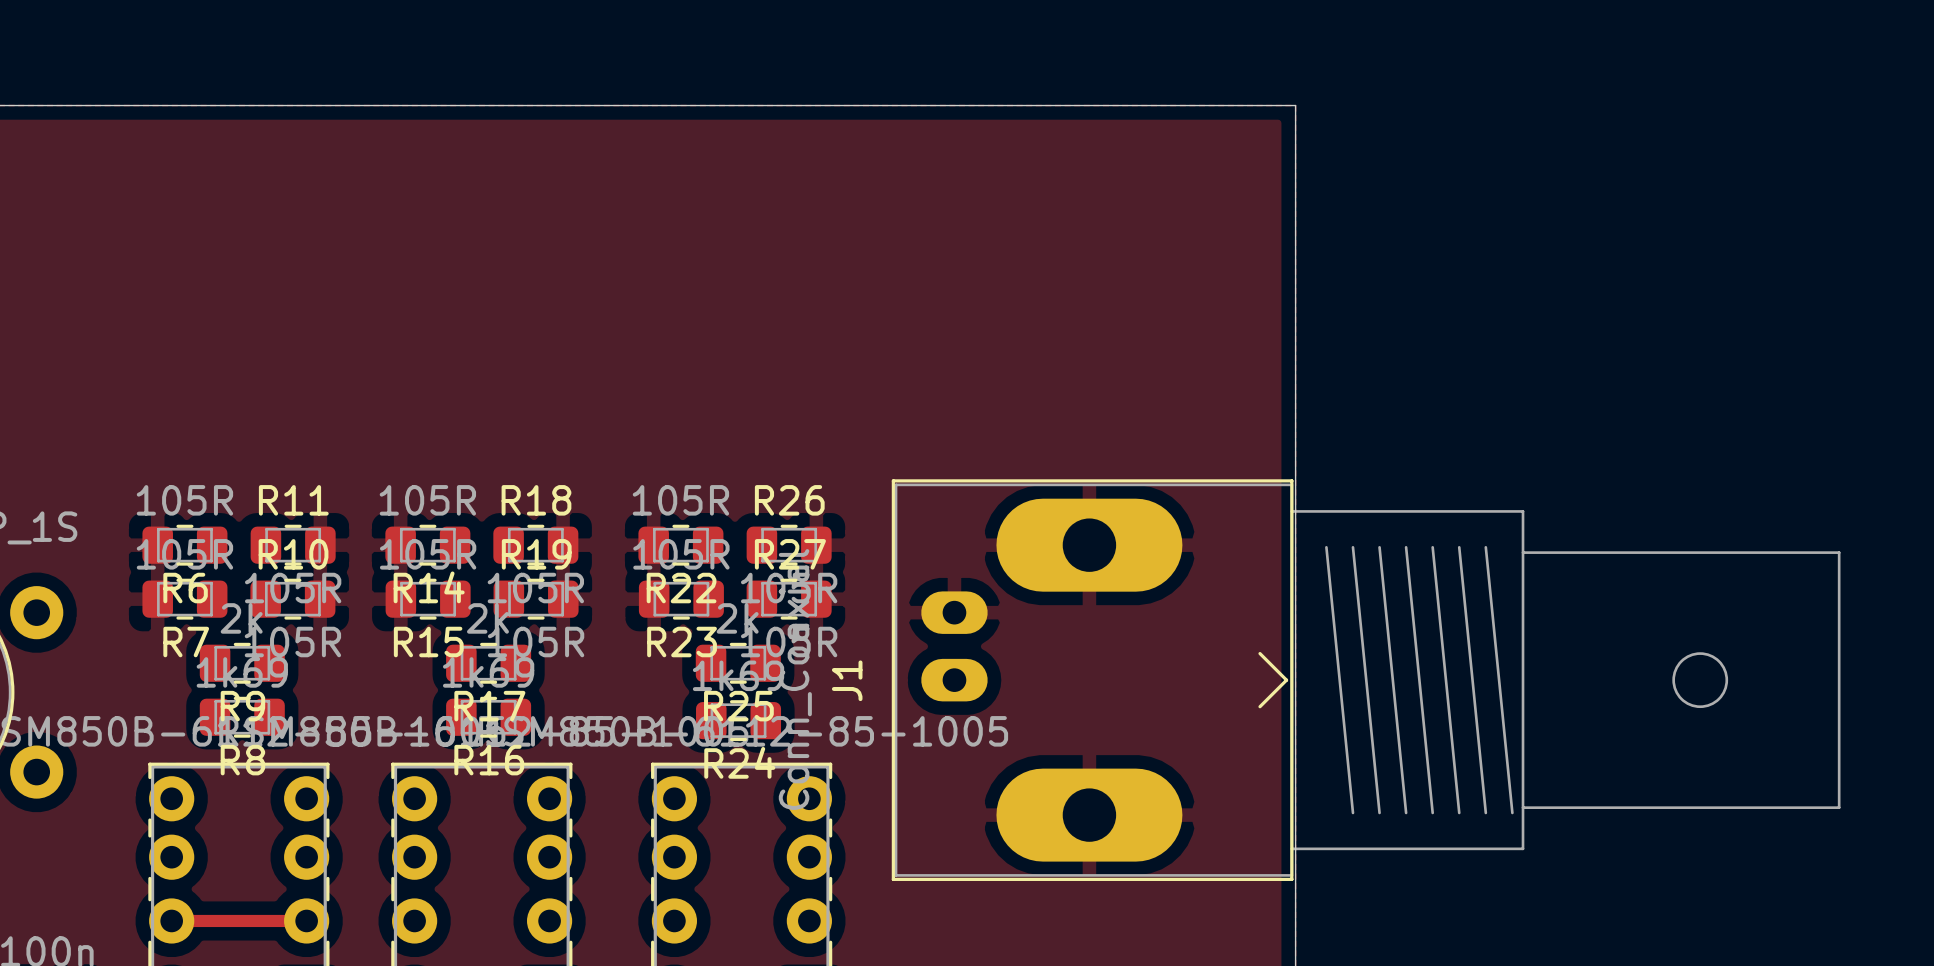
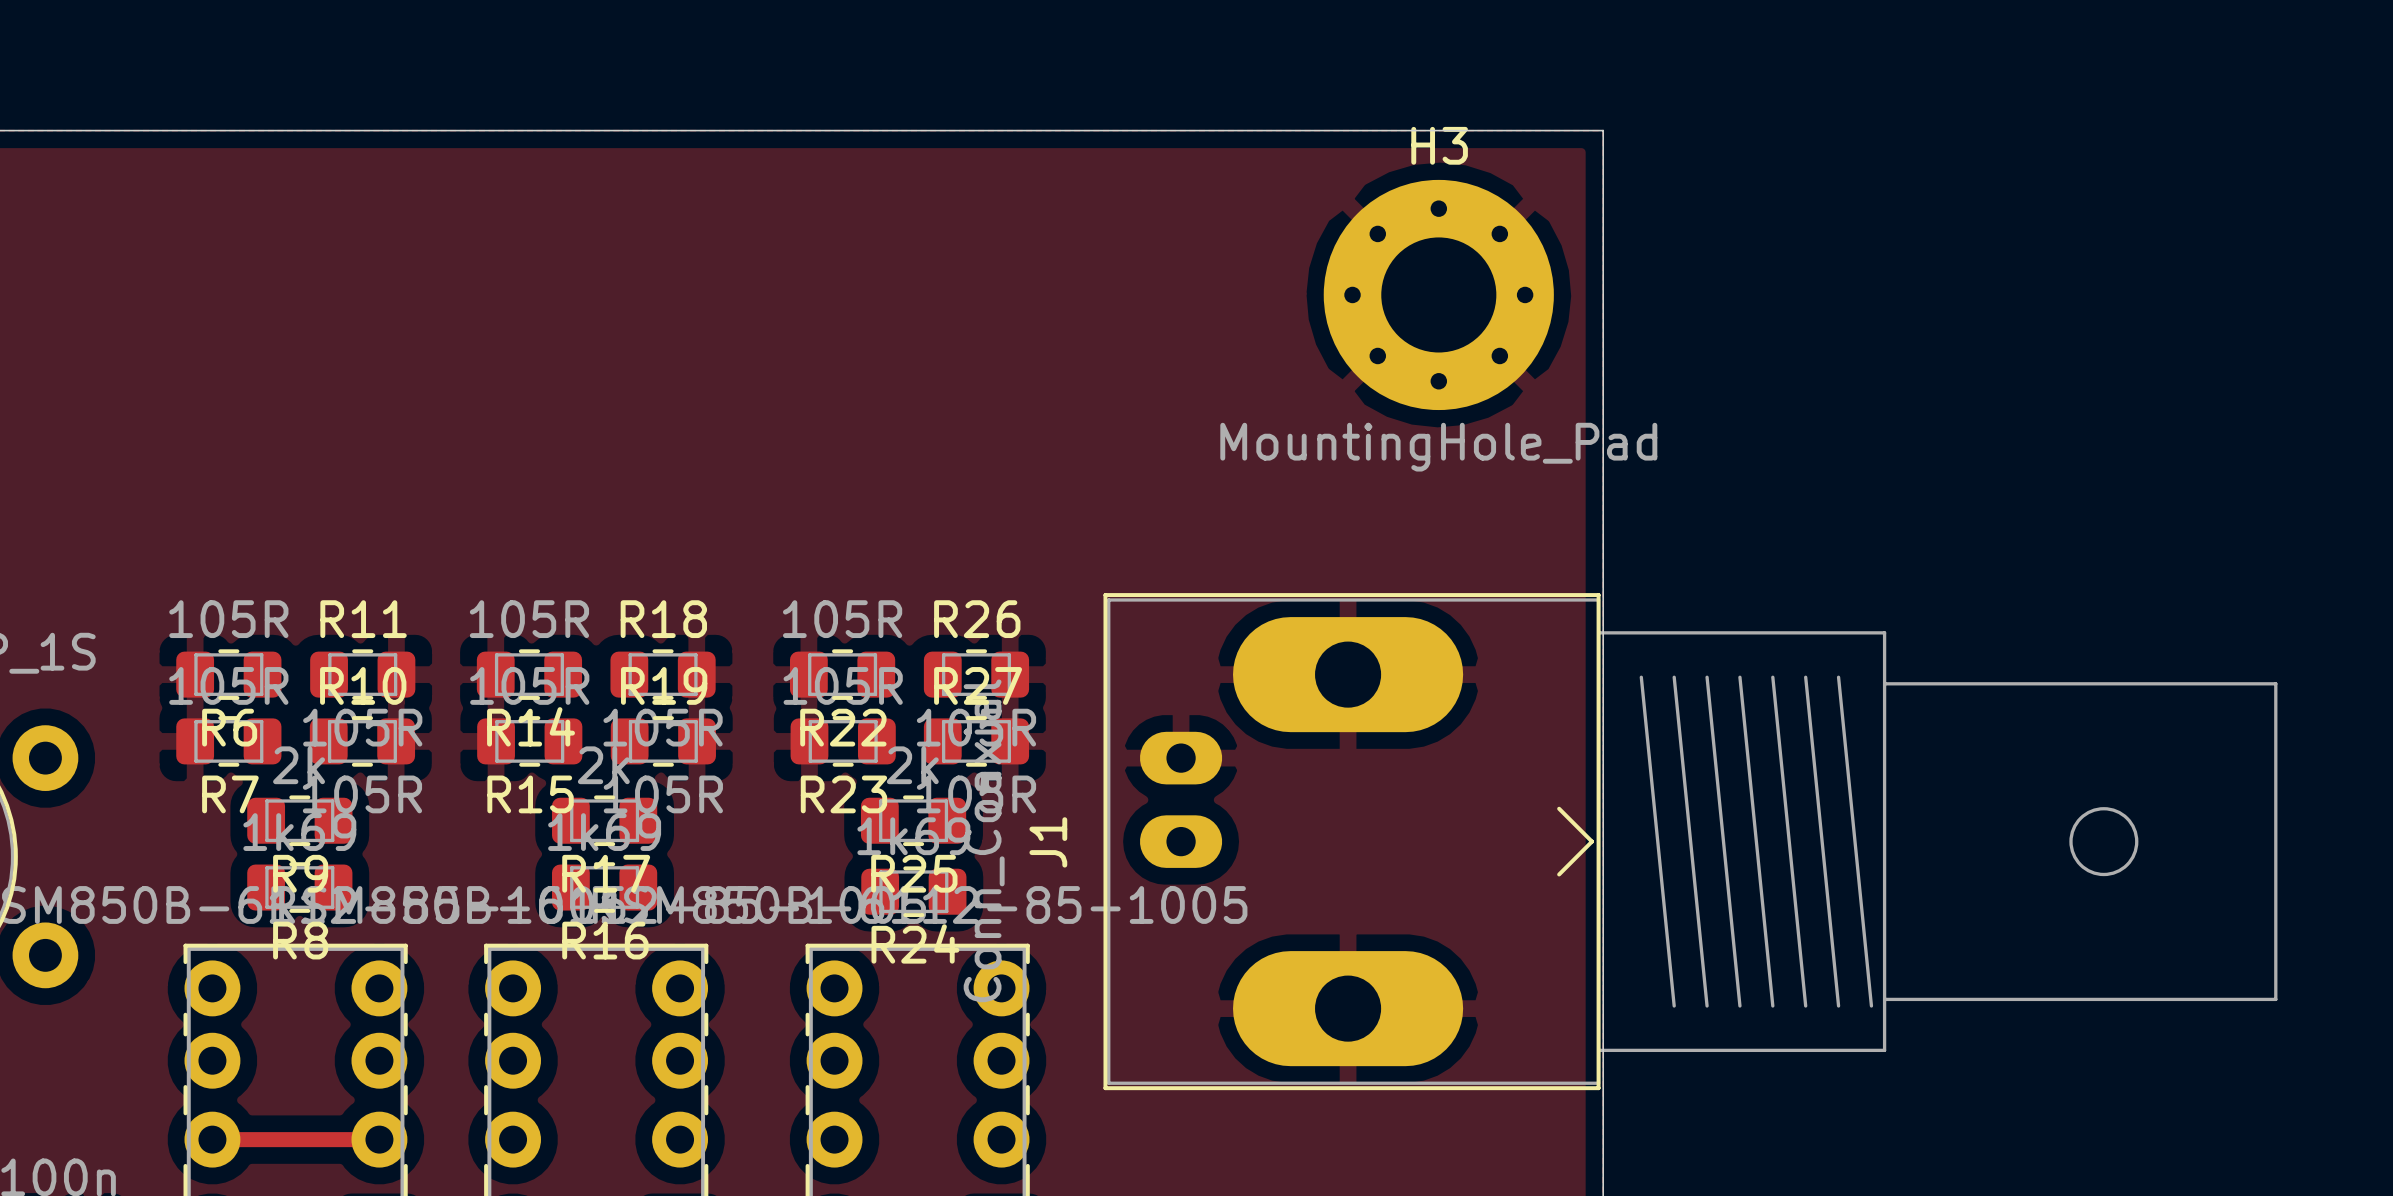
H3: none -> MountingHole_Pad (1438, 294)

